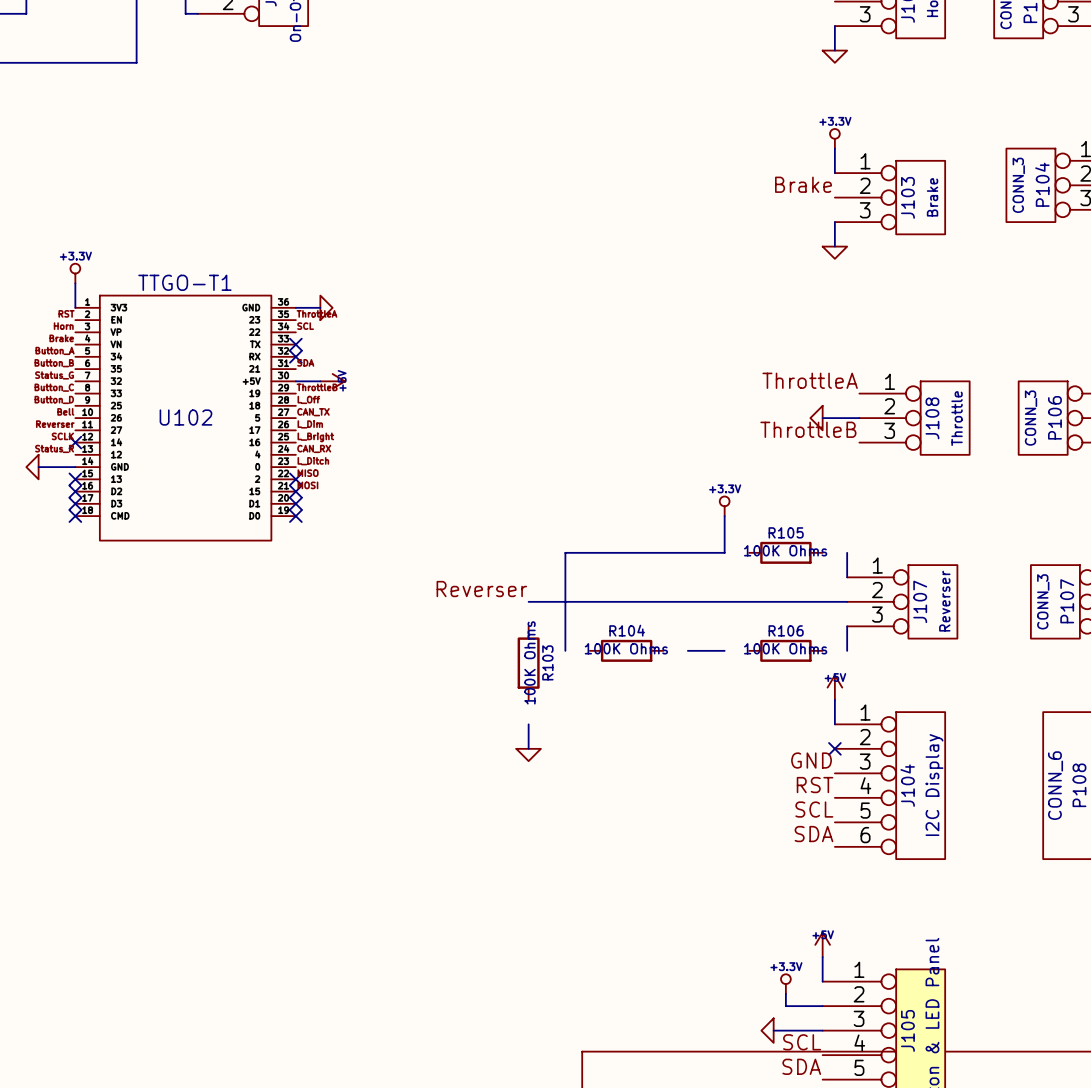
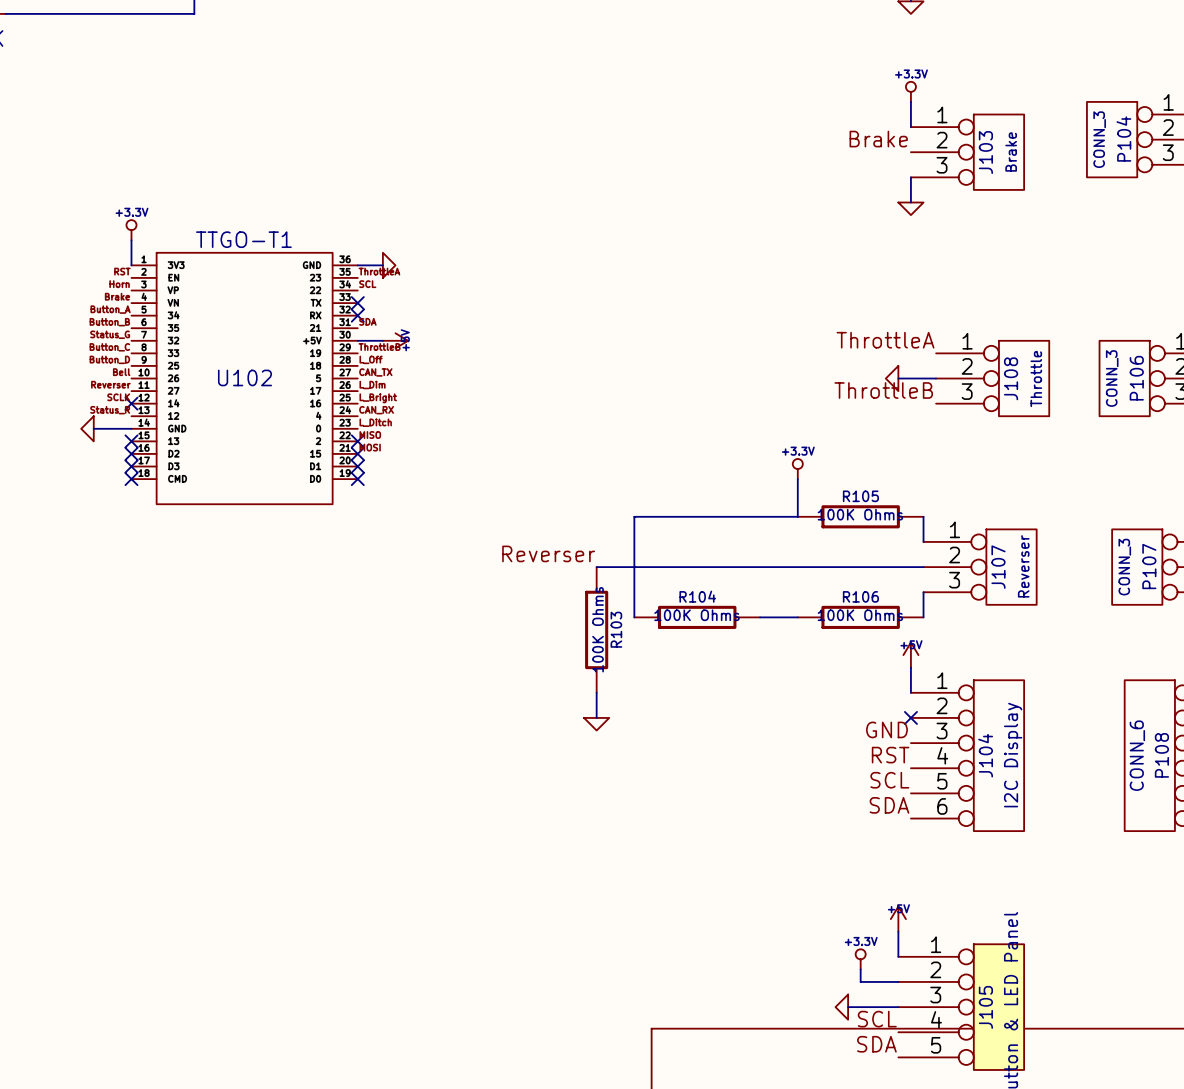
R105 symbol: [749, 541, 823, 564] -> [797, 505, 924, 529]
R103 symbol: [517, 626, 540, 700] -> [585, 567, 609, 693]
R104 symbol: [589, 639, 664, 662] -> [634, 605, 761, 629]
R106 symbol: [749, 639, 823, 662] -> [797, 605, 924, 629]

